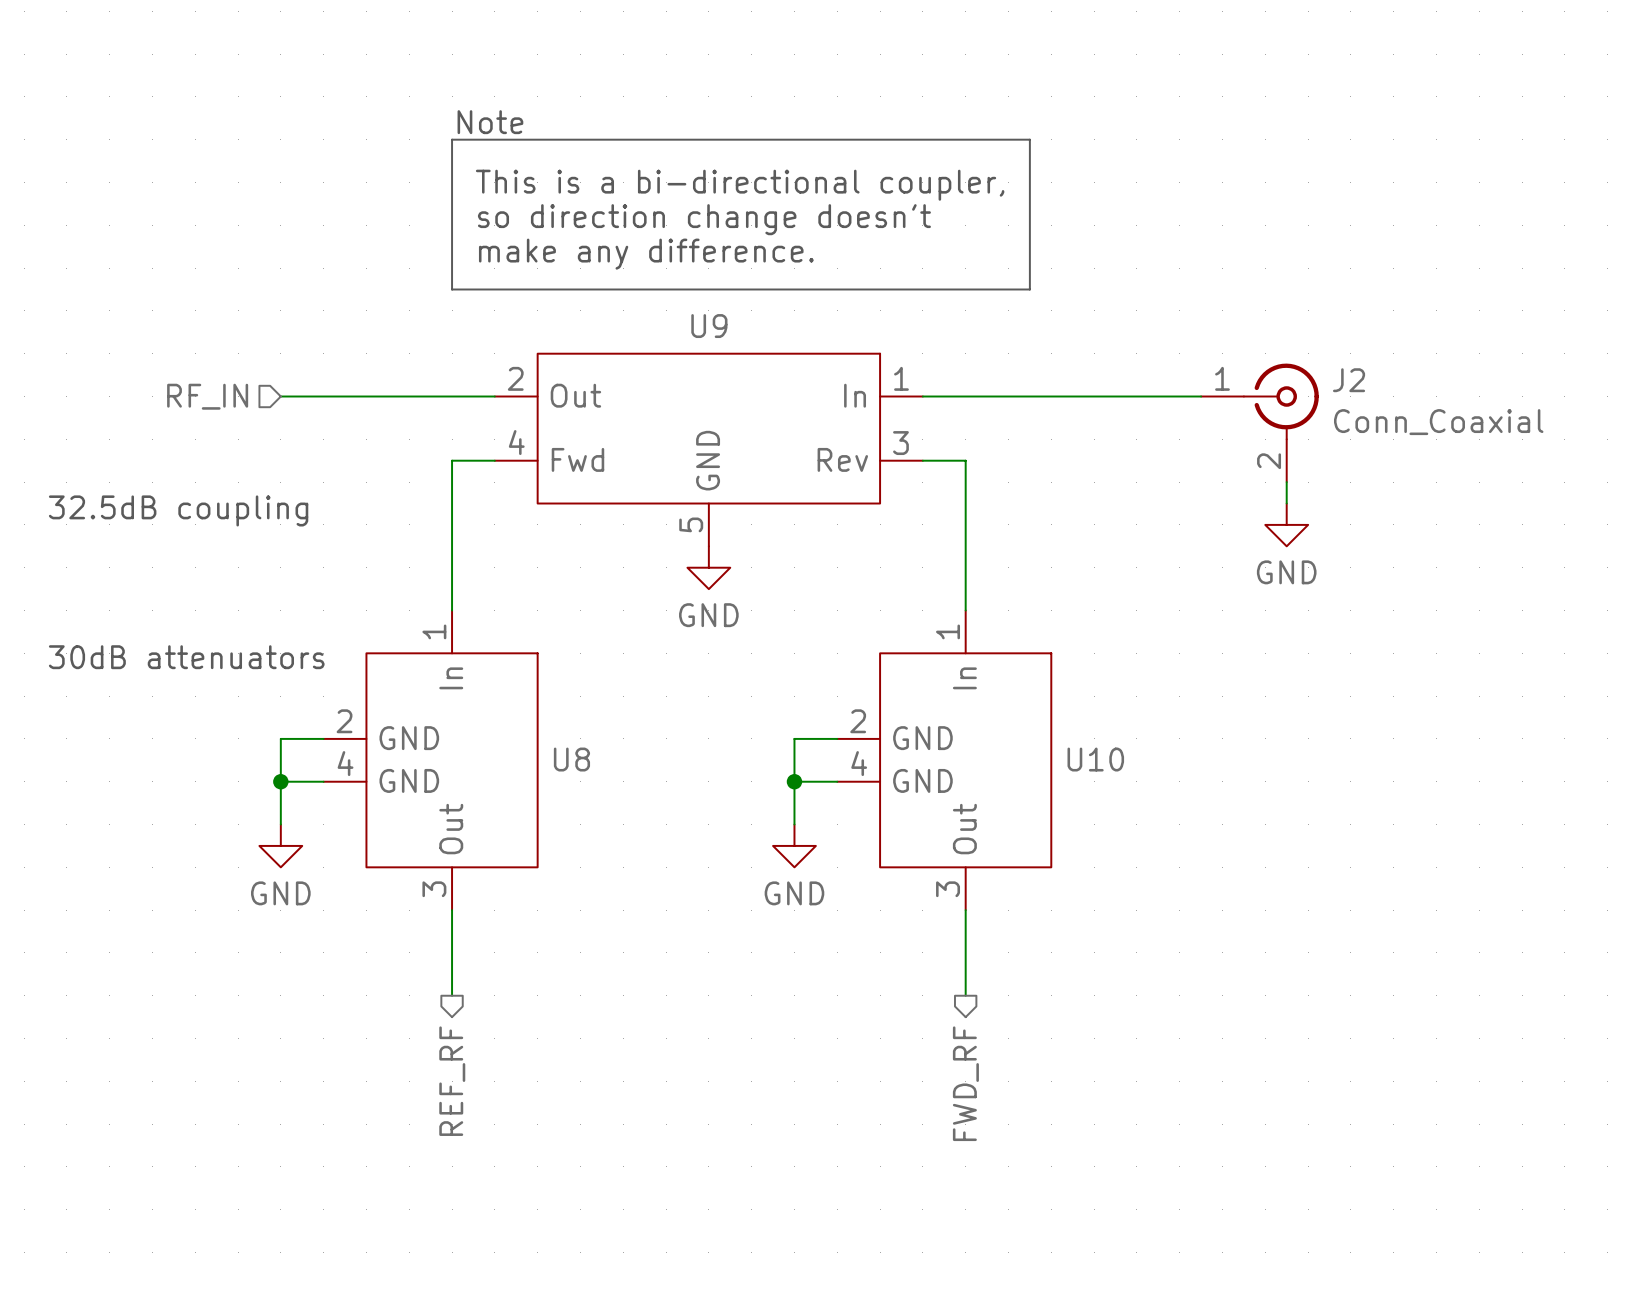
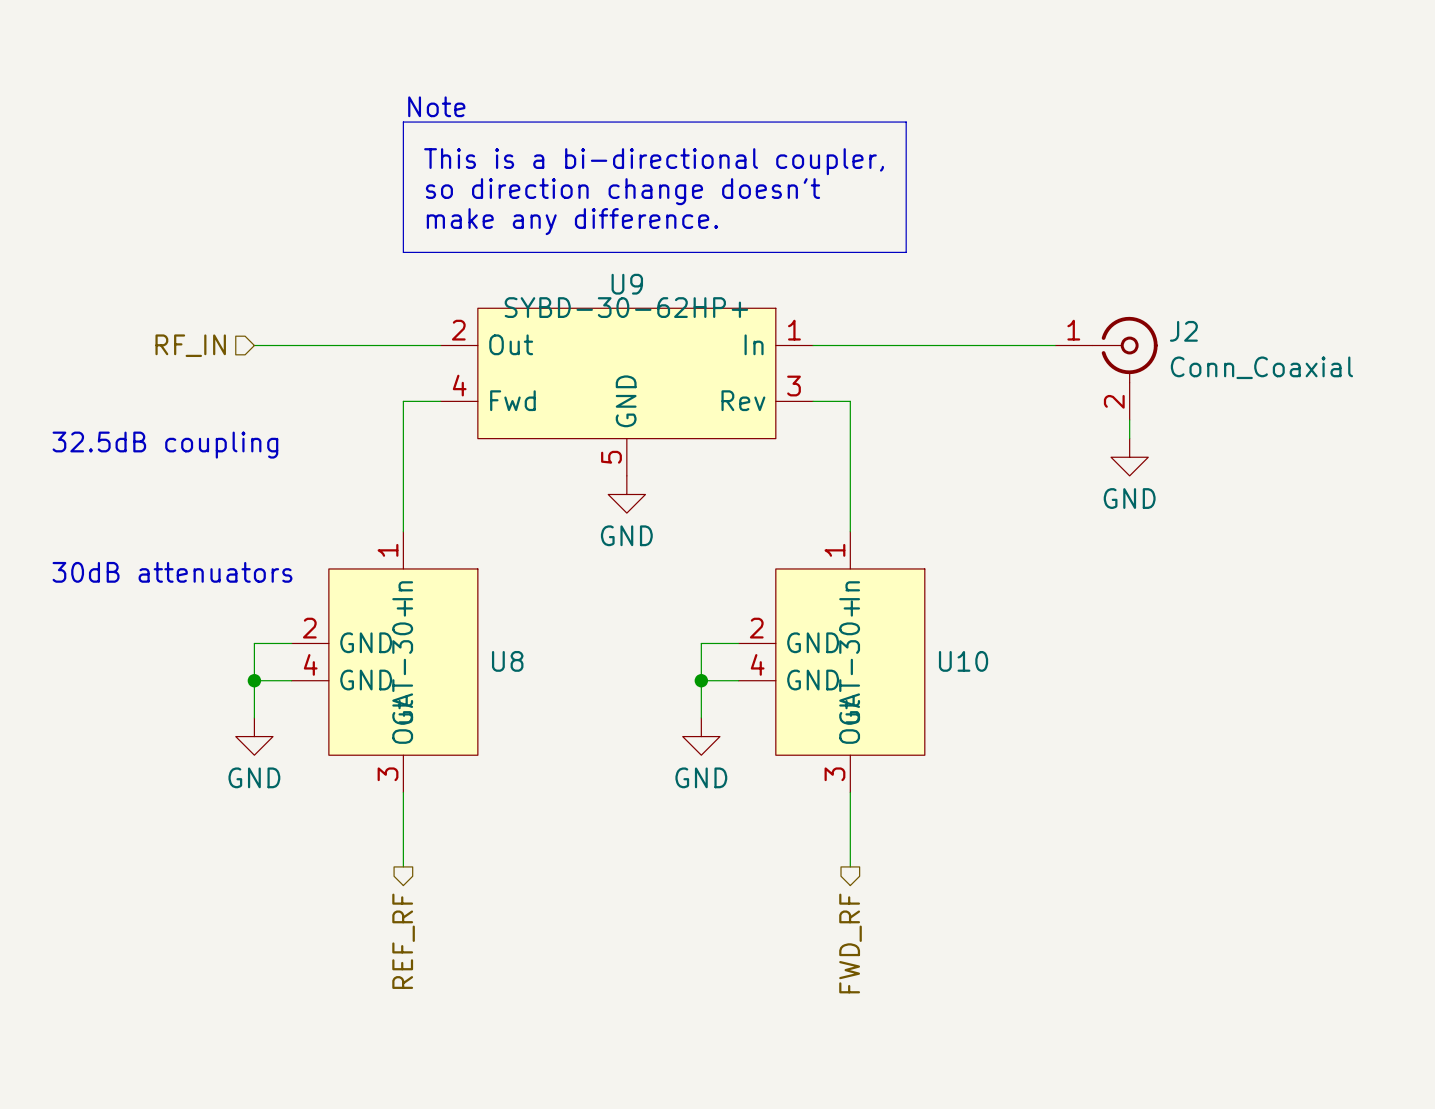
U9 value: none -> SYBD-30-62HP+ (626, 307)
U8 value: none -> GAT-30+ (402, 662)
U10 value: none -> GAT-30+ (849, 662)

